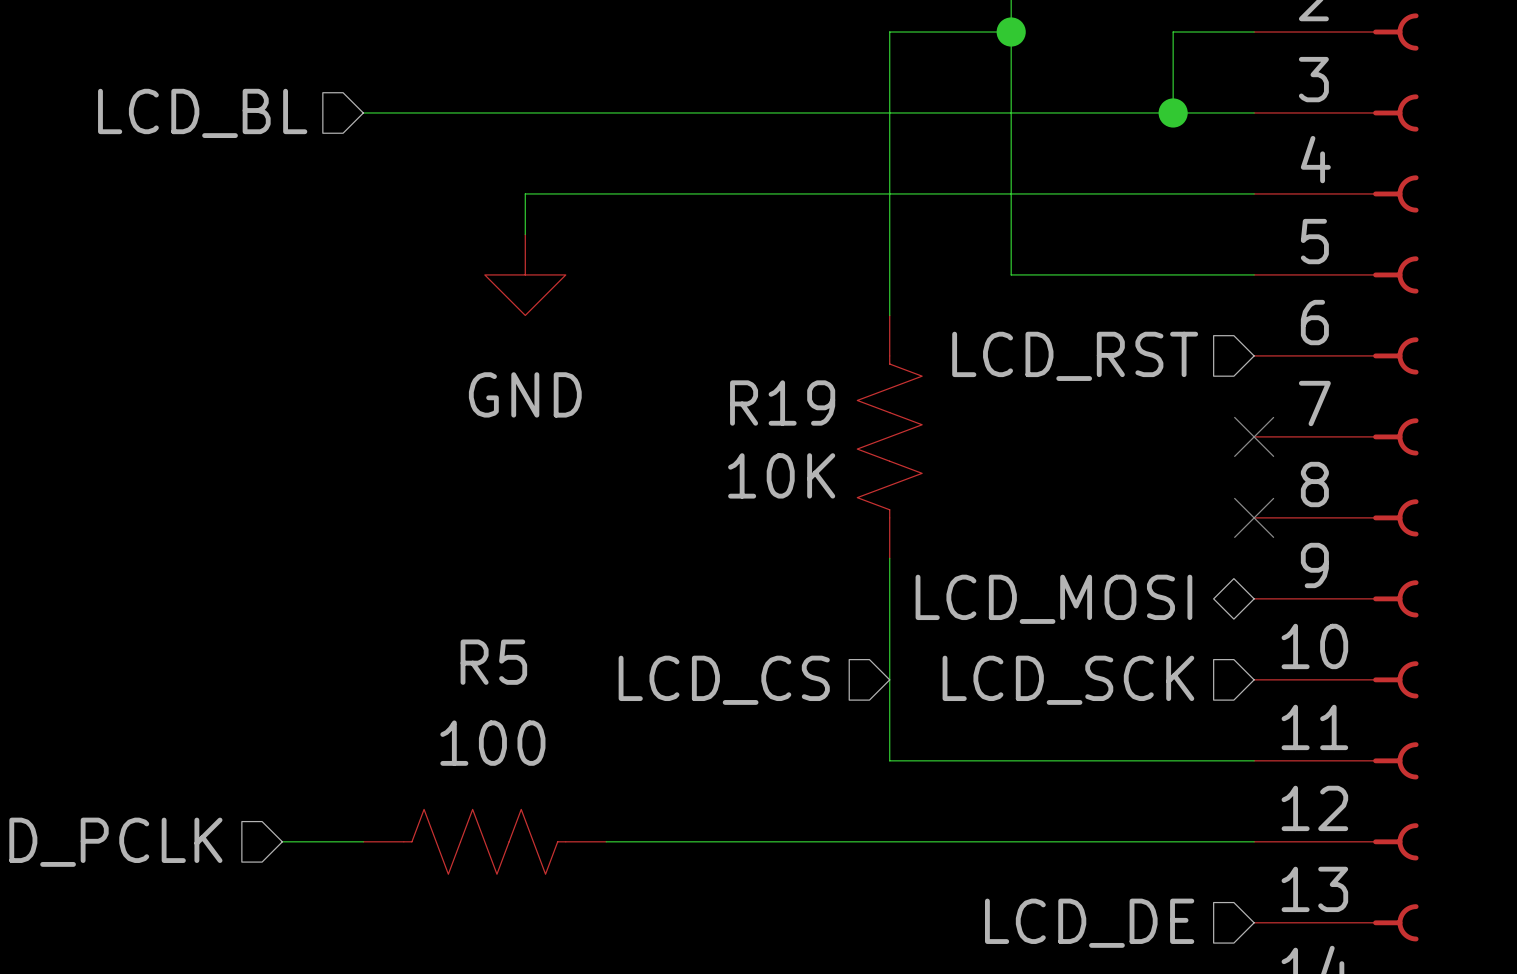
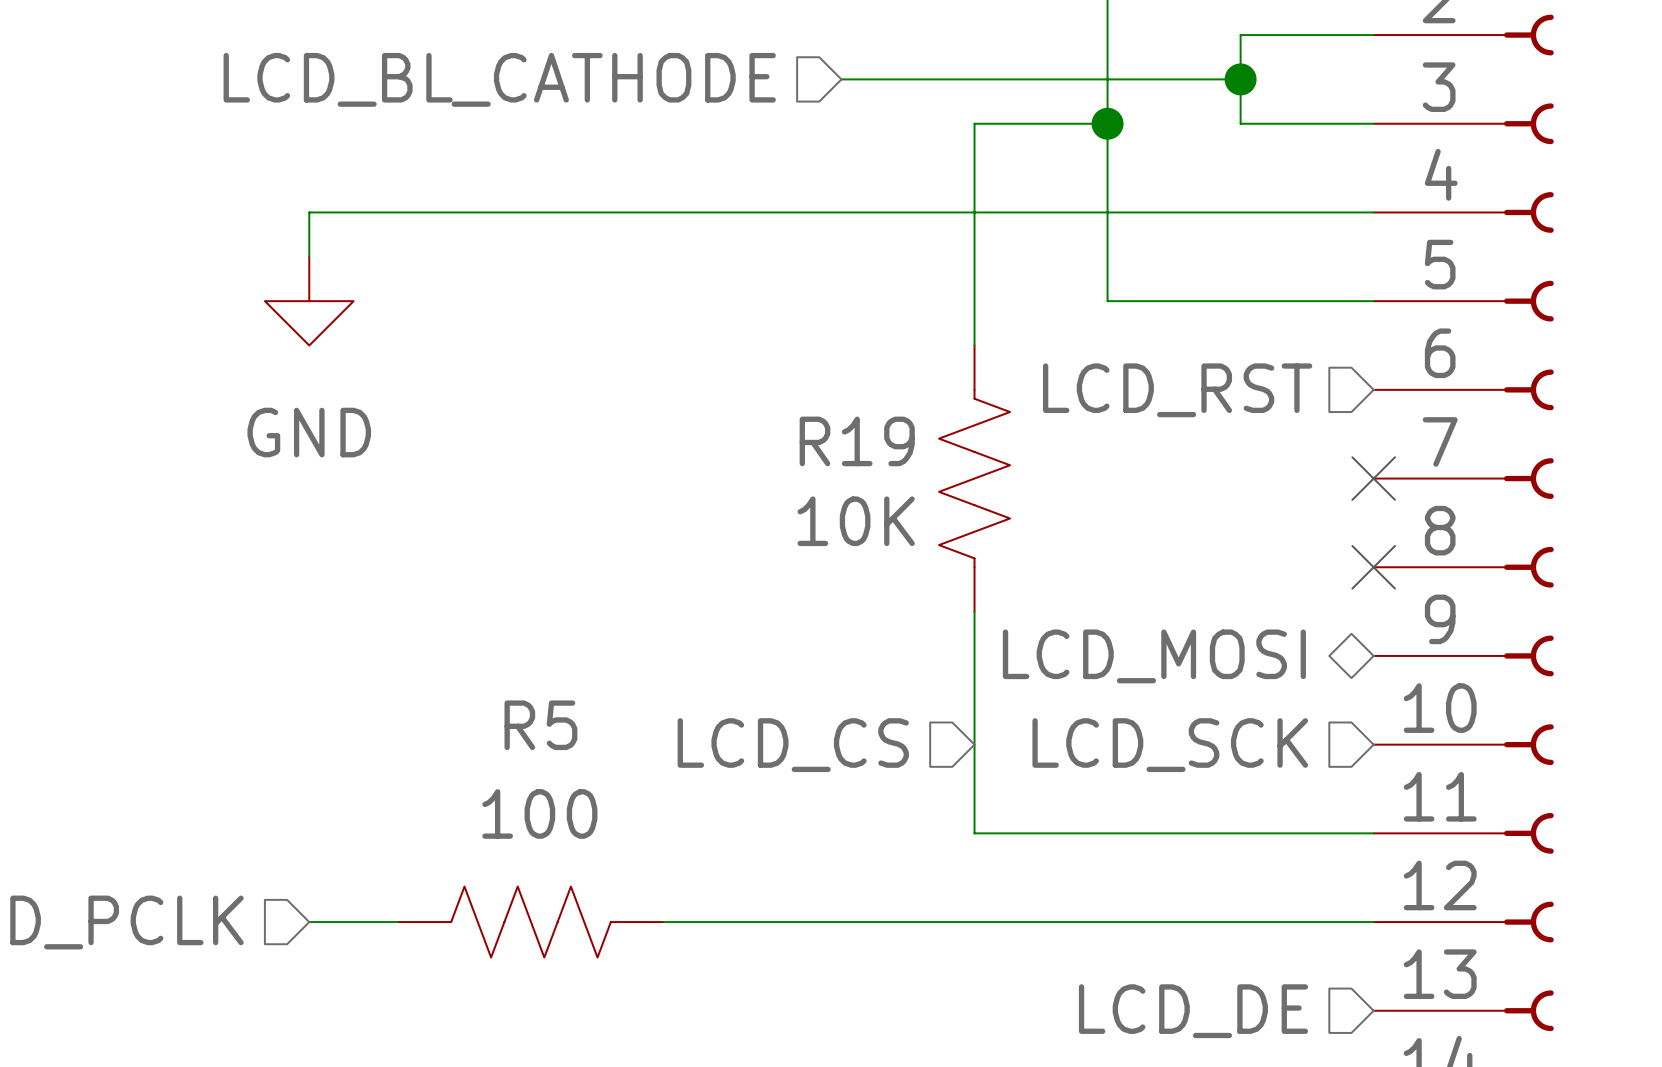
wire: (1011, 32) (889, 32) (889, 112) (363, 112) -> none
junction: (1011, 32) -> none
wire: (1173, 32) (1173, 112) -> (1284, 35) (1240, 35) (1240, 123)
hierarchical label: none -> LCD_BL_CATHODE (499, 79)
wire: none -> (841, 79) (1240, 79)
wire: (1011, 112) (1132, 112) -> none
junction: none -> (1107, 123)
junction position: (1173, 112) -> (1240, 79)
hierarchical label: LCD_BL (202, 113) -> none
wire: (525, 193) (525, 234) -> (575, 212) (309, 212) (309, 256)
power symbol position: GND (525, 274) -> GND (309, 301)

